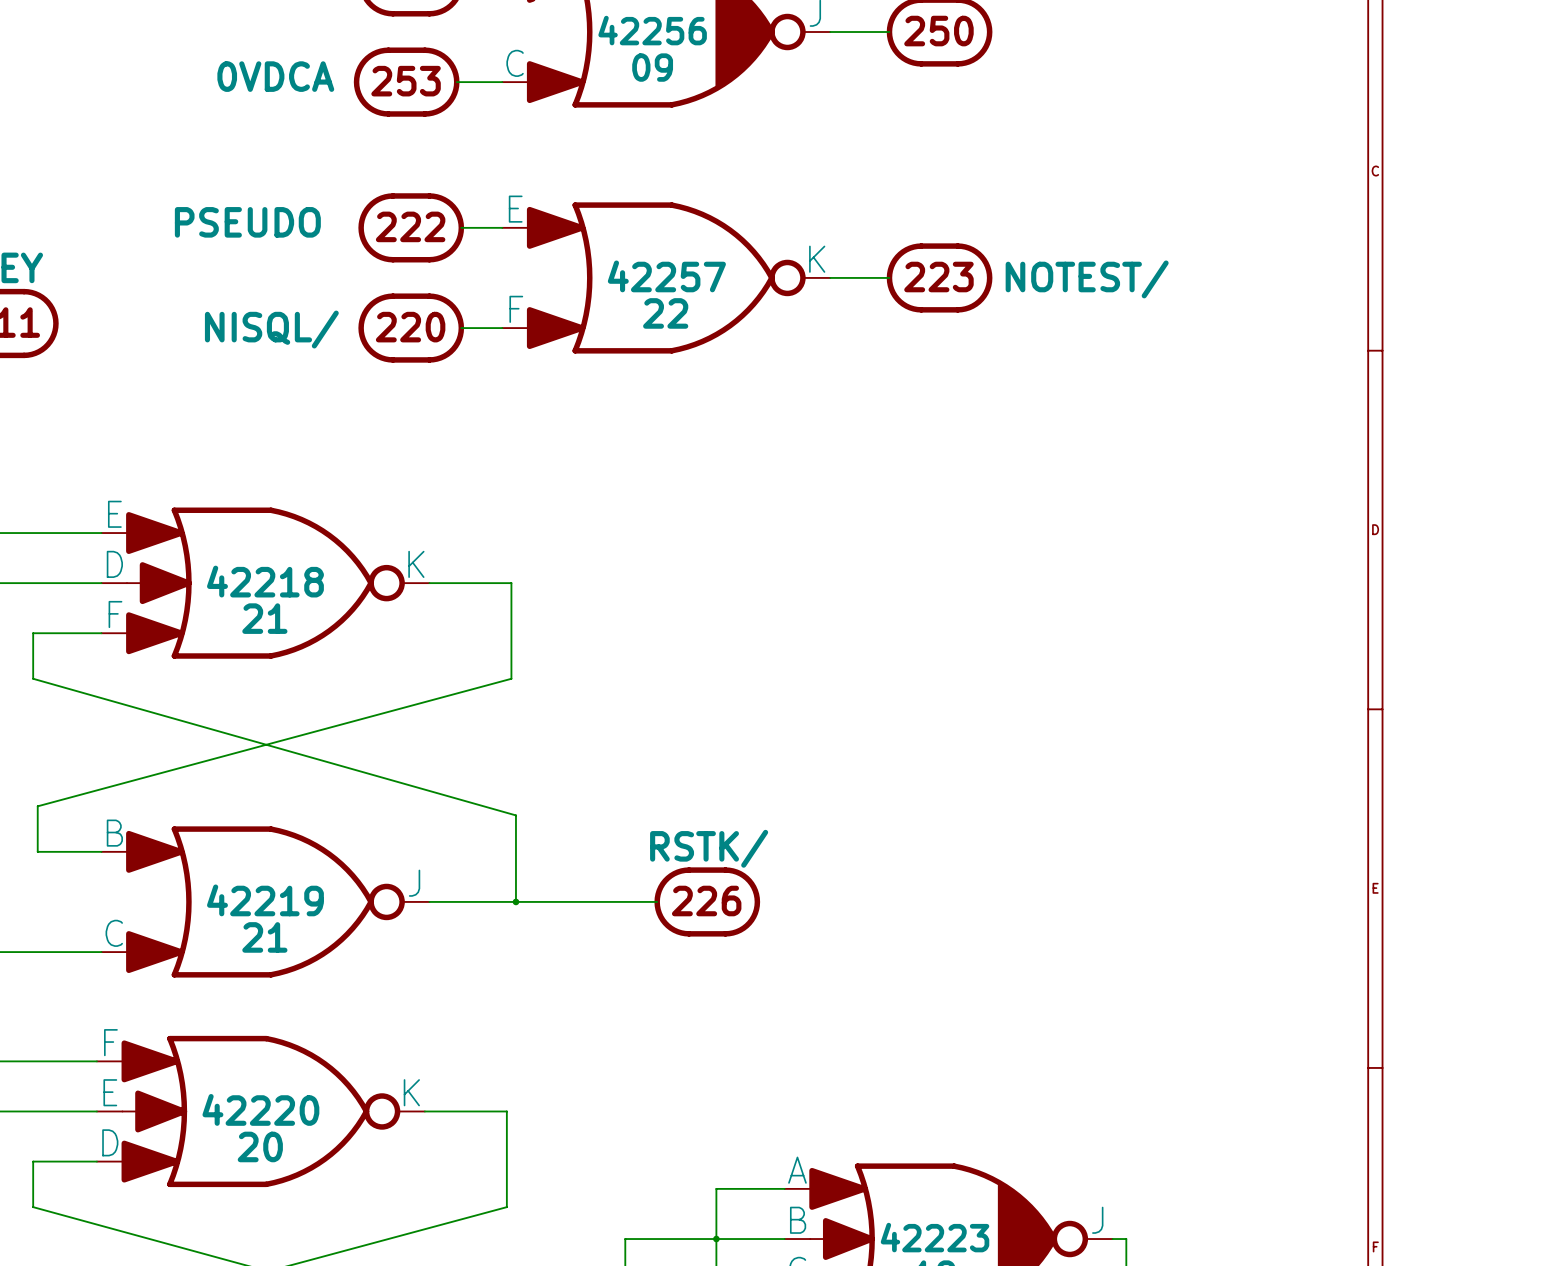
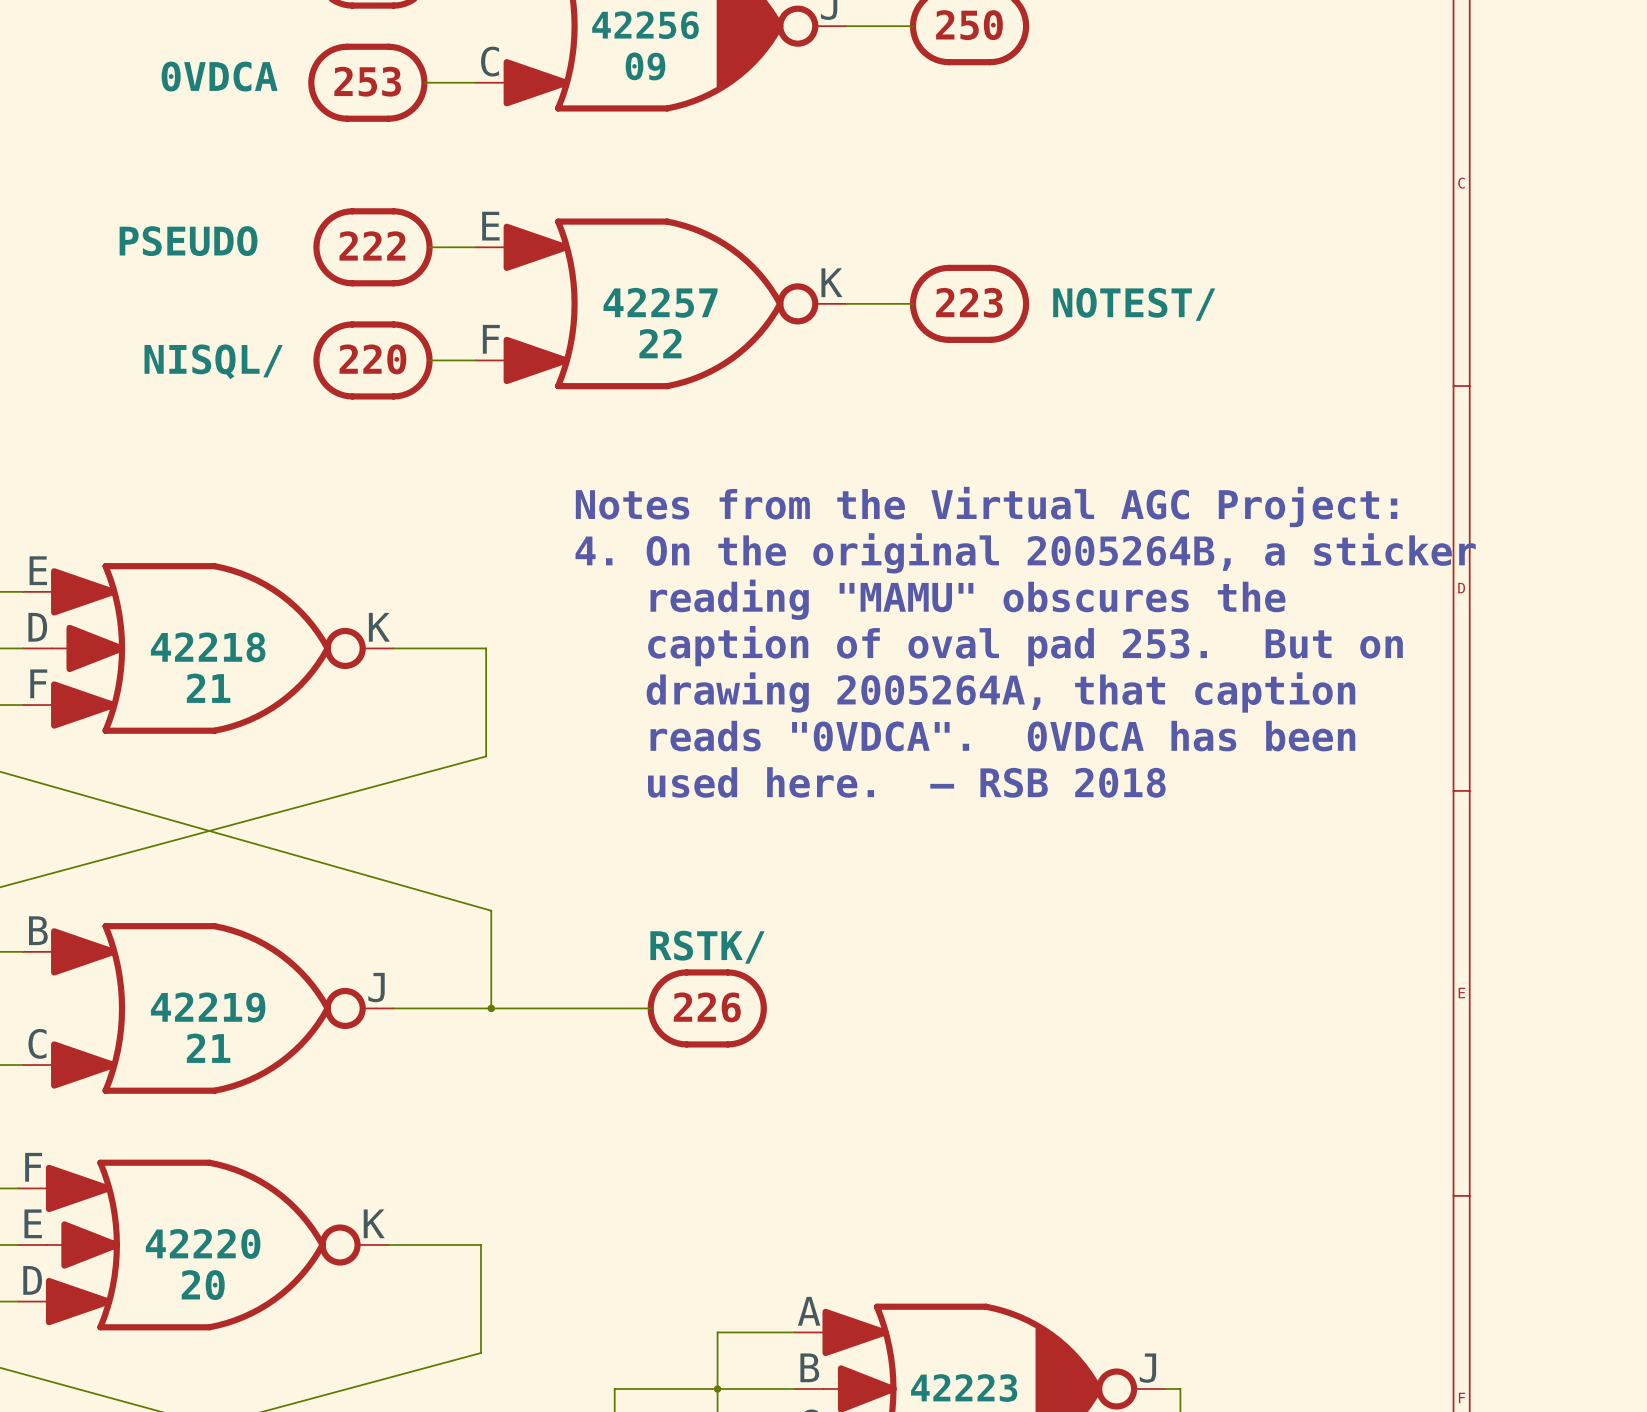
text: none -> Notes from the Virtual AGC Project: (986, 507)
text: none -> 4. On the original 2005264B, a sticker (1025, 553)
text: none -> reading "MAMU" obscures the (967, 599)
text: none -> caption of oval pad 253. But on (1025, 646)
text: none -> drawing 2005264A, that caption (1000, 692)
text: none -> reads "0VDCA". 0VDCA has been (1002, 736)
text: none -> used here. — RSB 2018 (906, 782)

